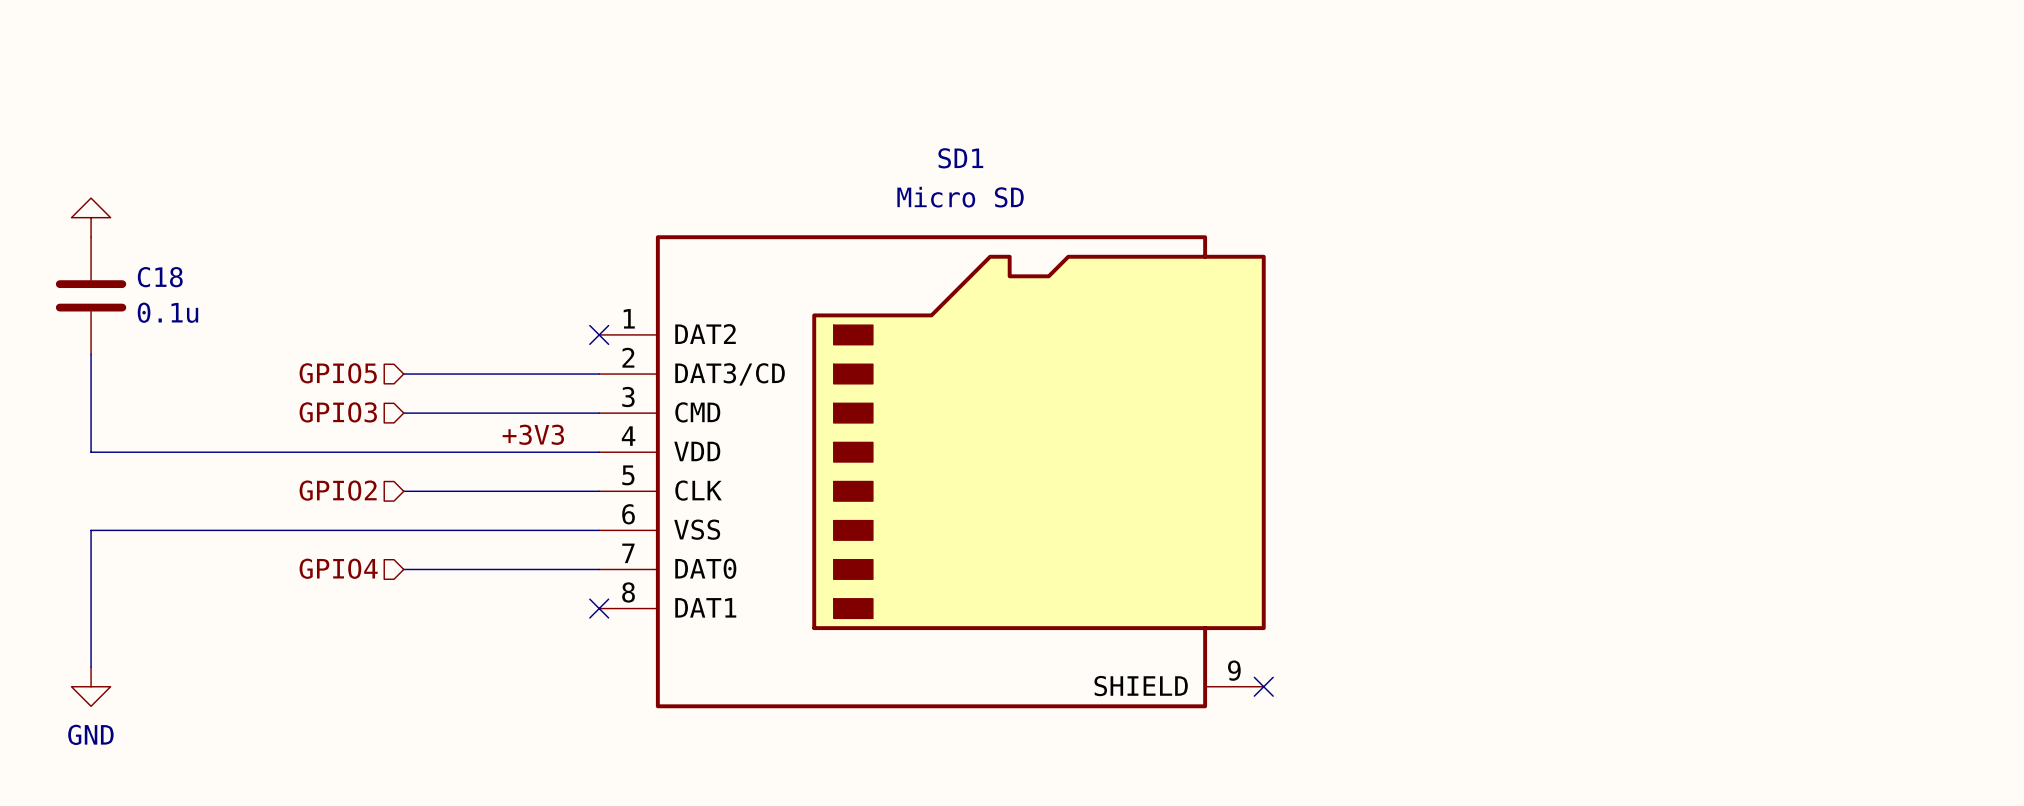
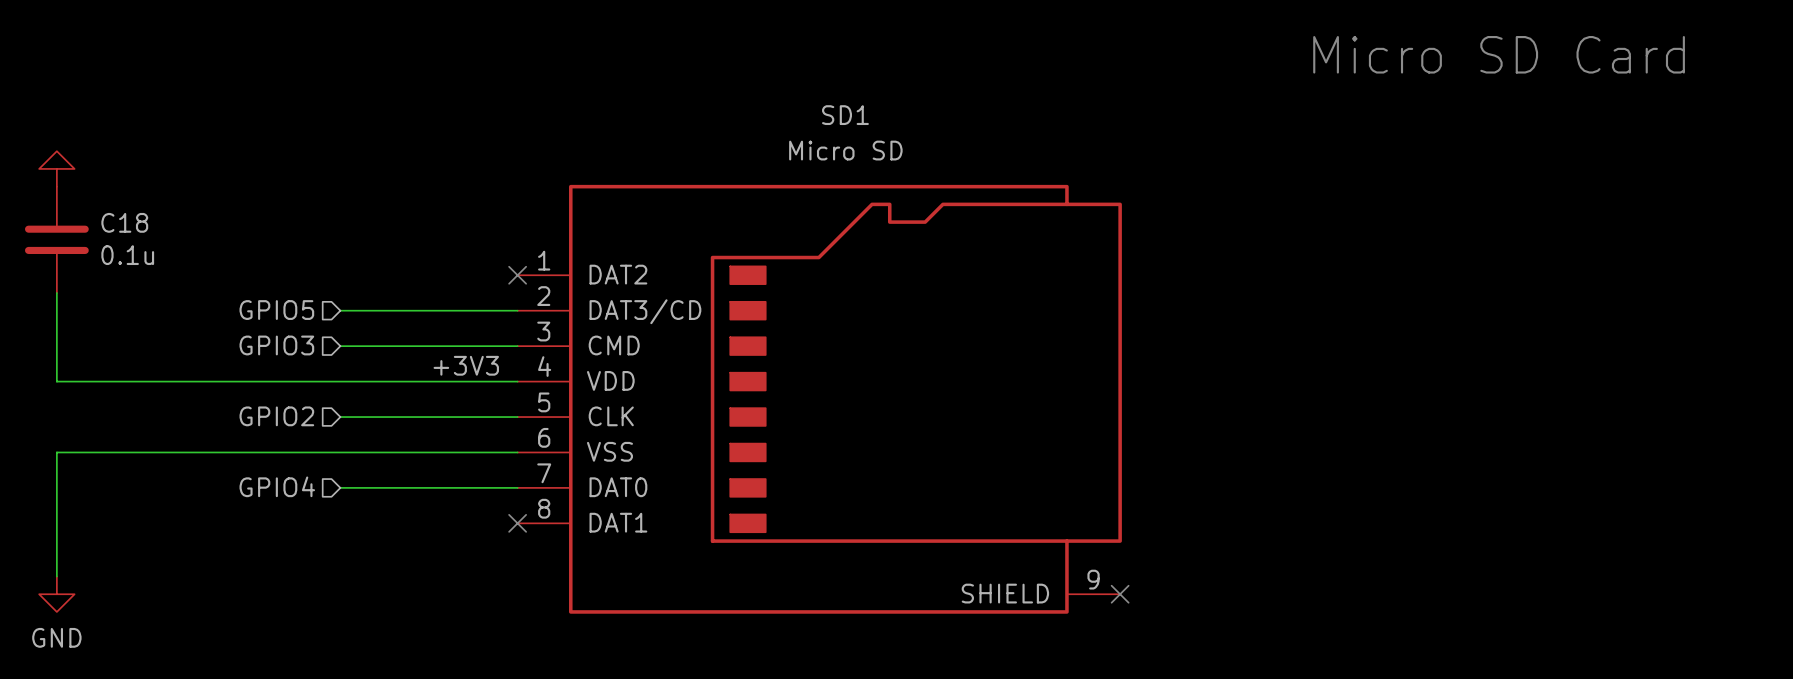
text: none -> Micro SD Card (1499, 54)

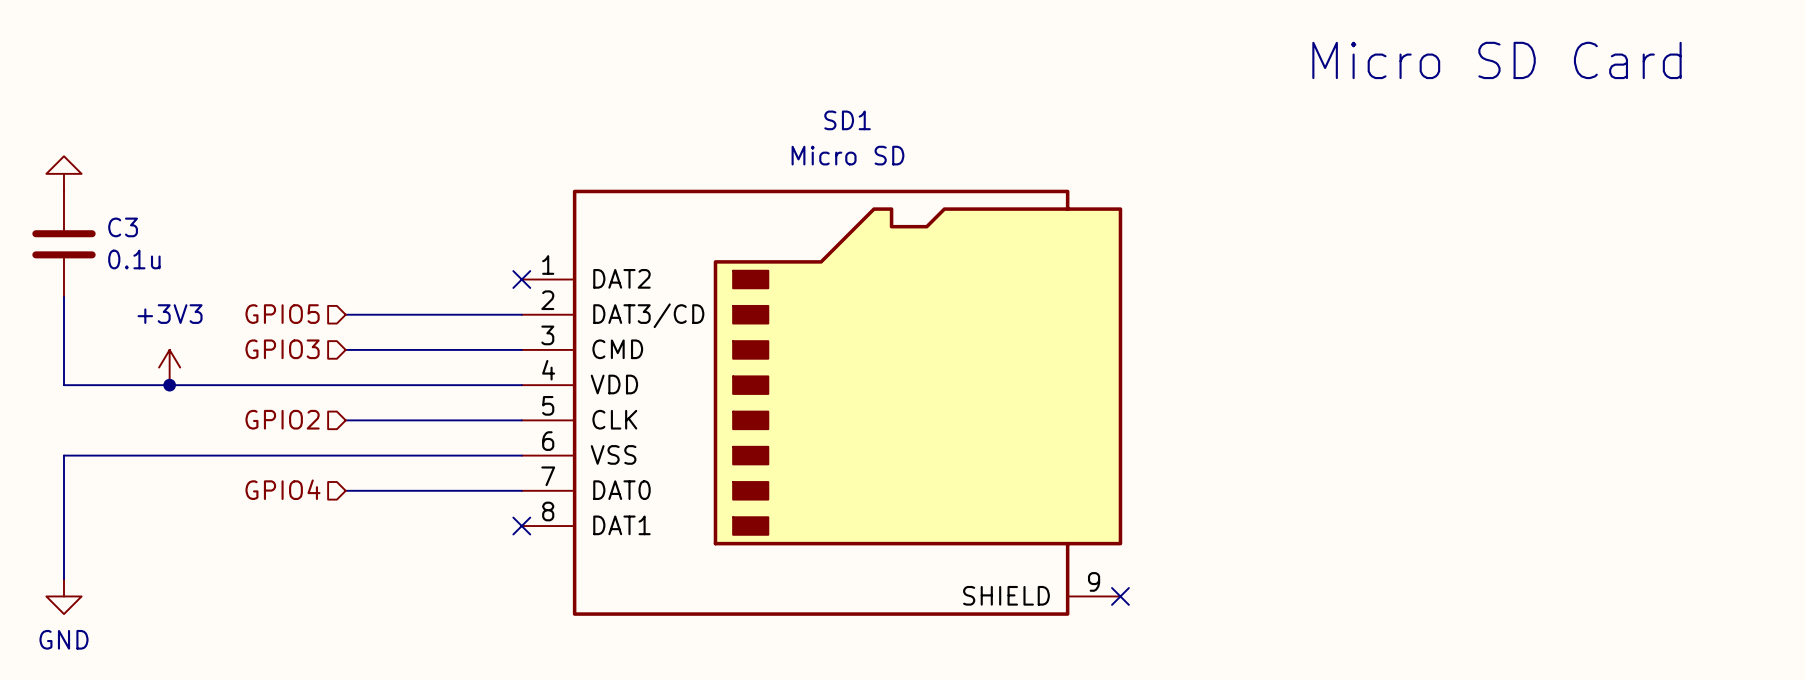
C18 name: C18 (124, 222) -> C3 (123, 227)
power symbol: none -> +3V3 (169, 367)
label: +3V3 (466, 365) -> none
junction: none -> (169, 385)

